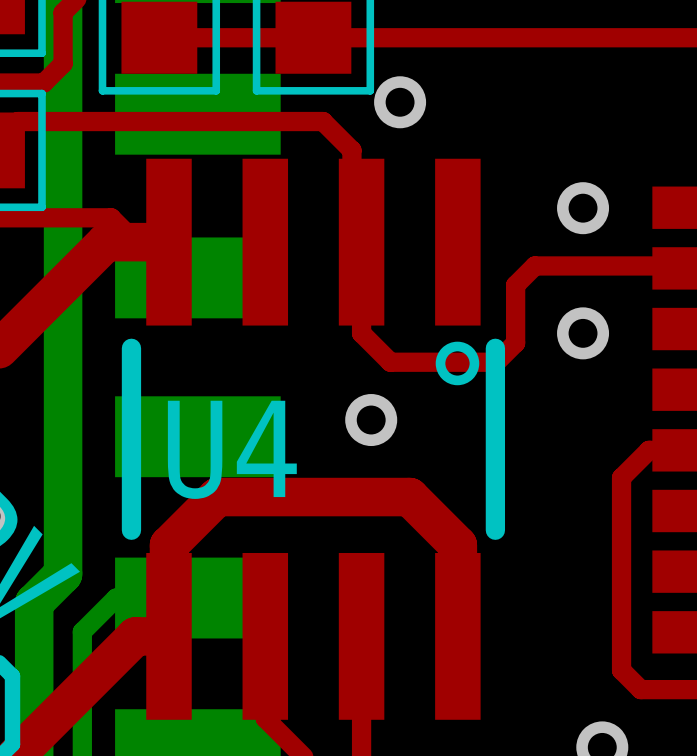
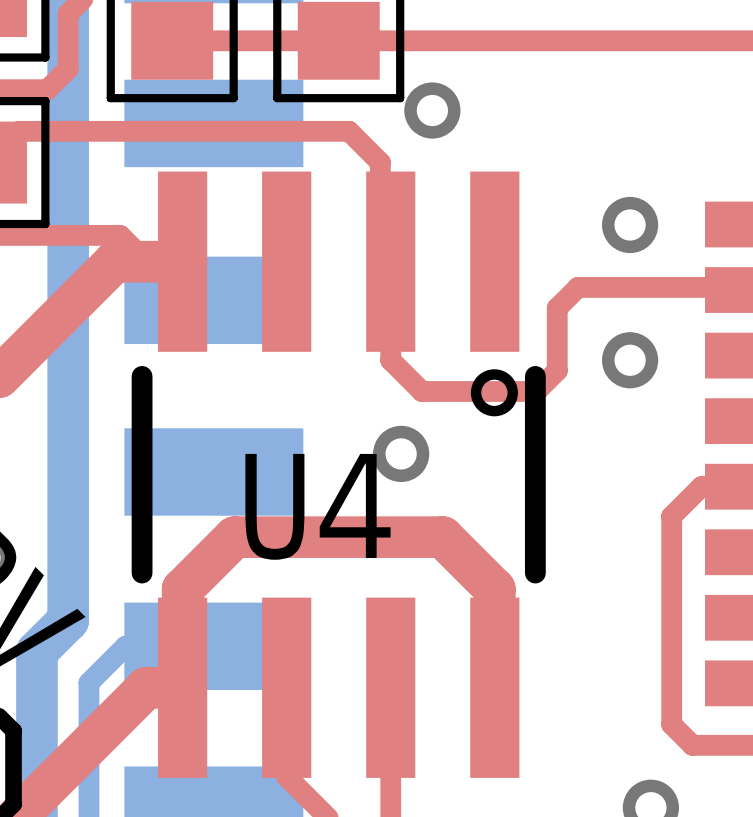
U4 name position: U4 (232, 449) -> U4 (317, 506)

